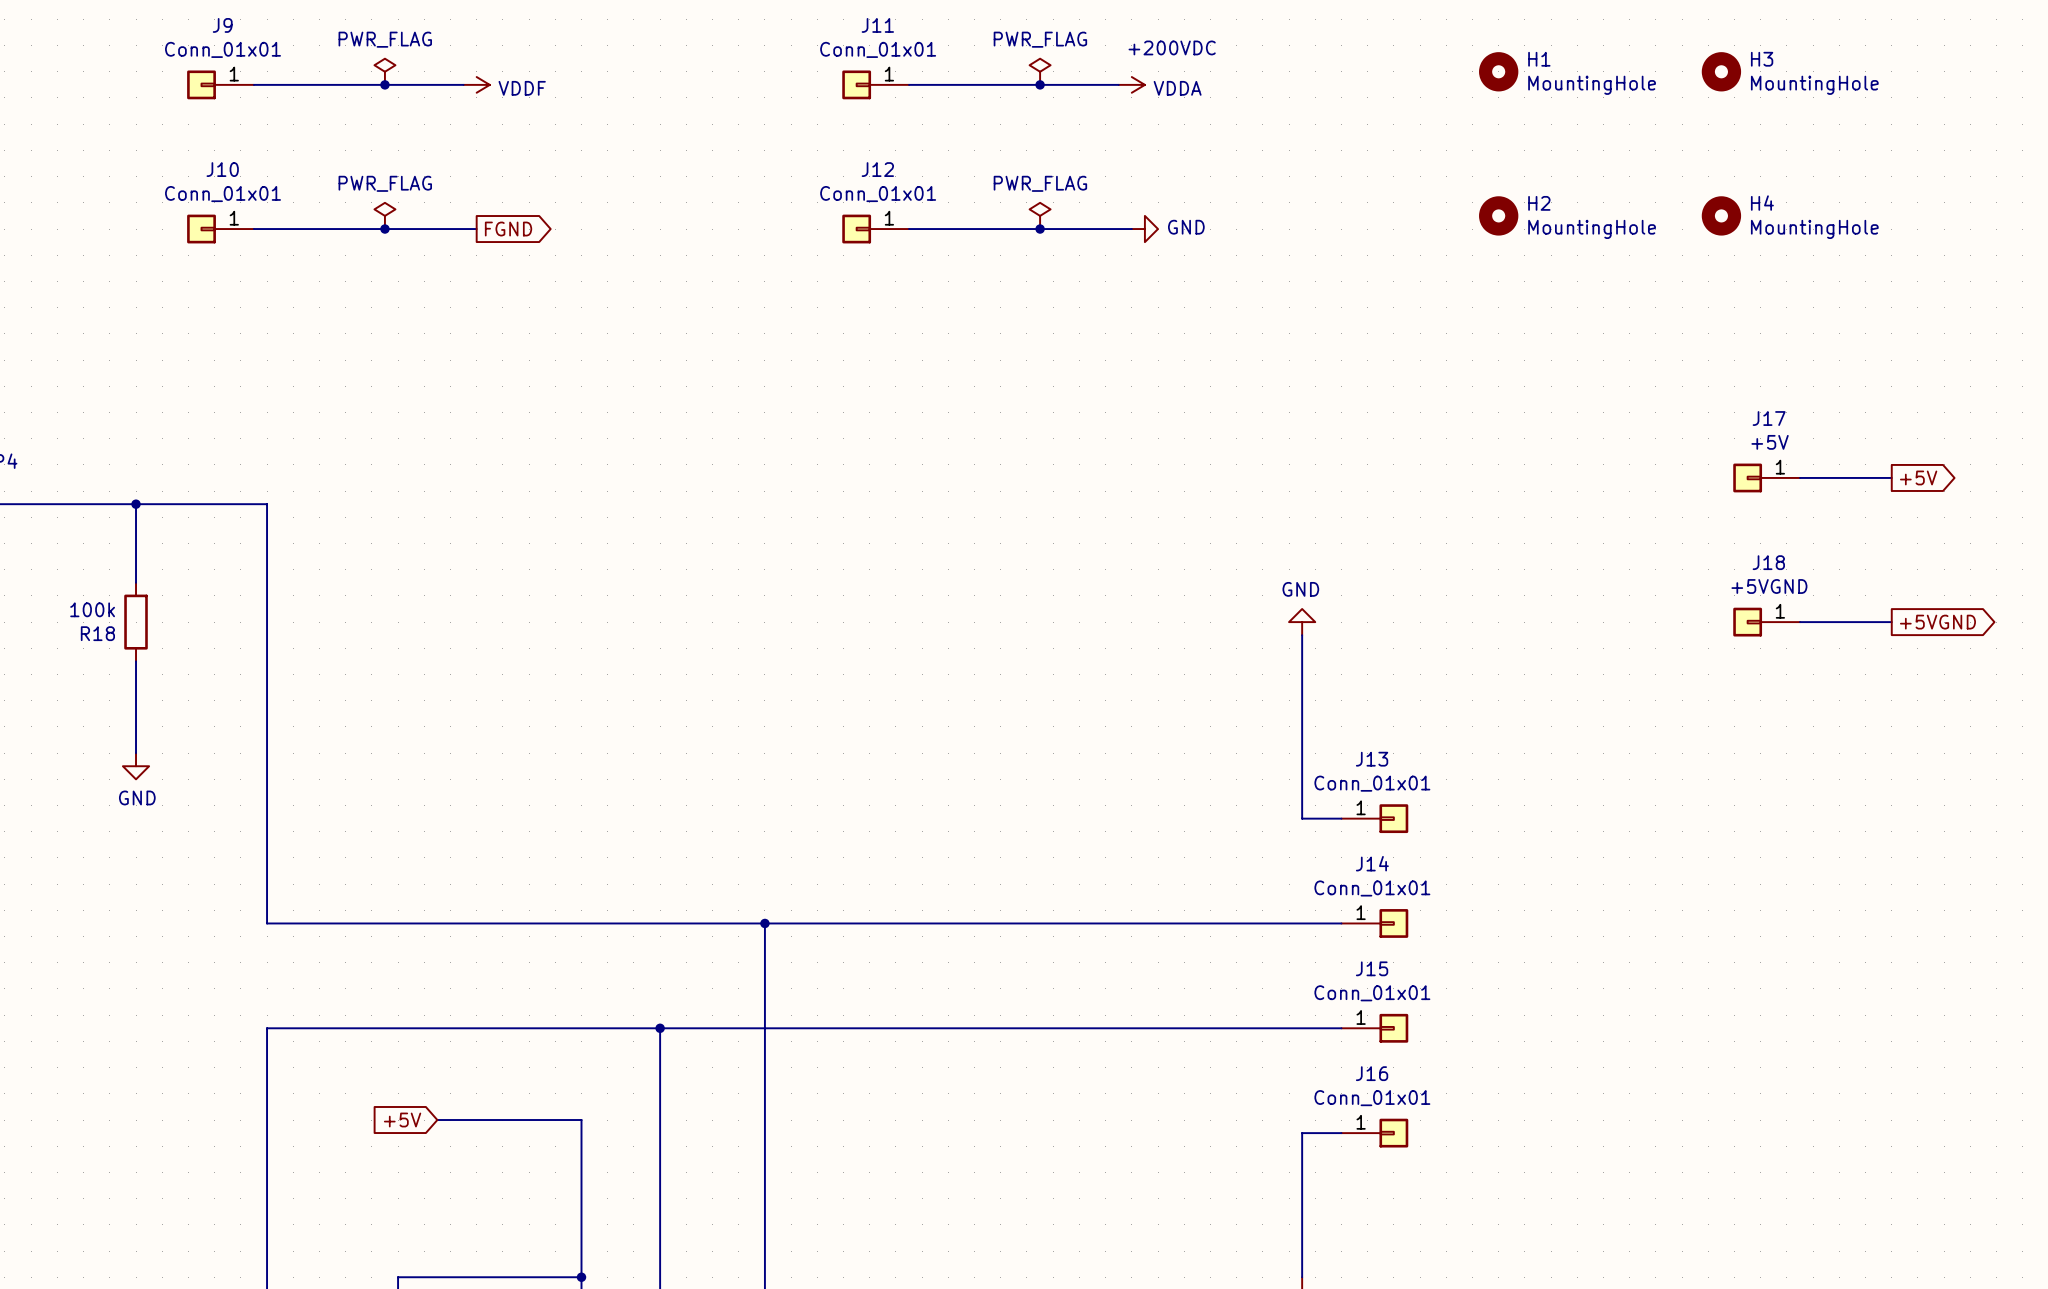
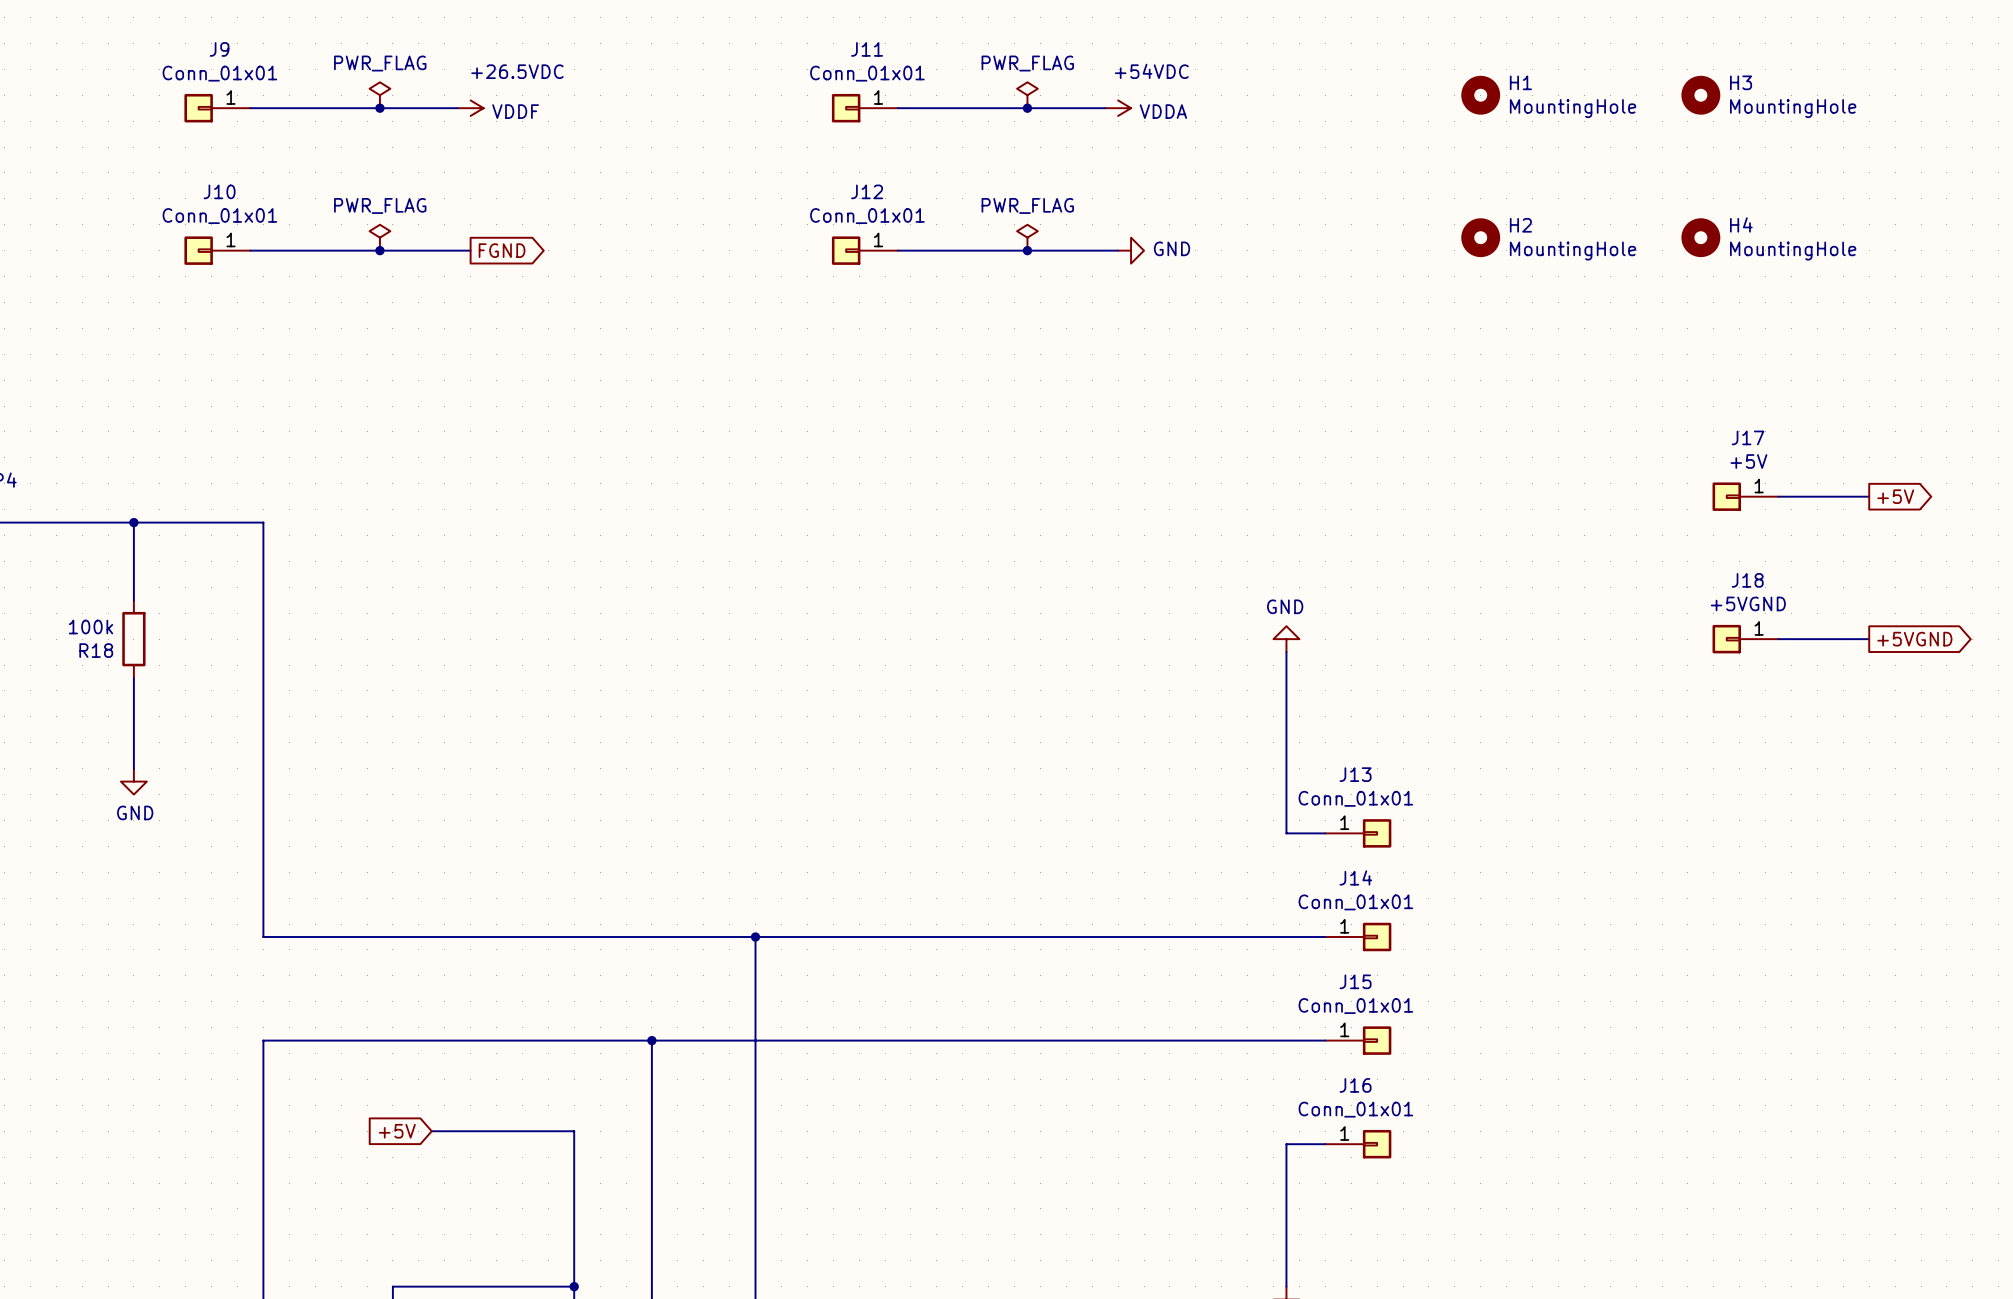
text: none -> +26.5VDC (517, 71)
text: +200VDC (1172, 47) -> +54VDC (1151, 71)

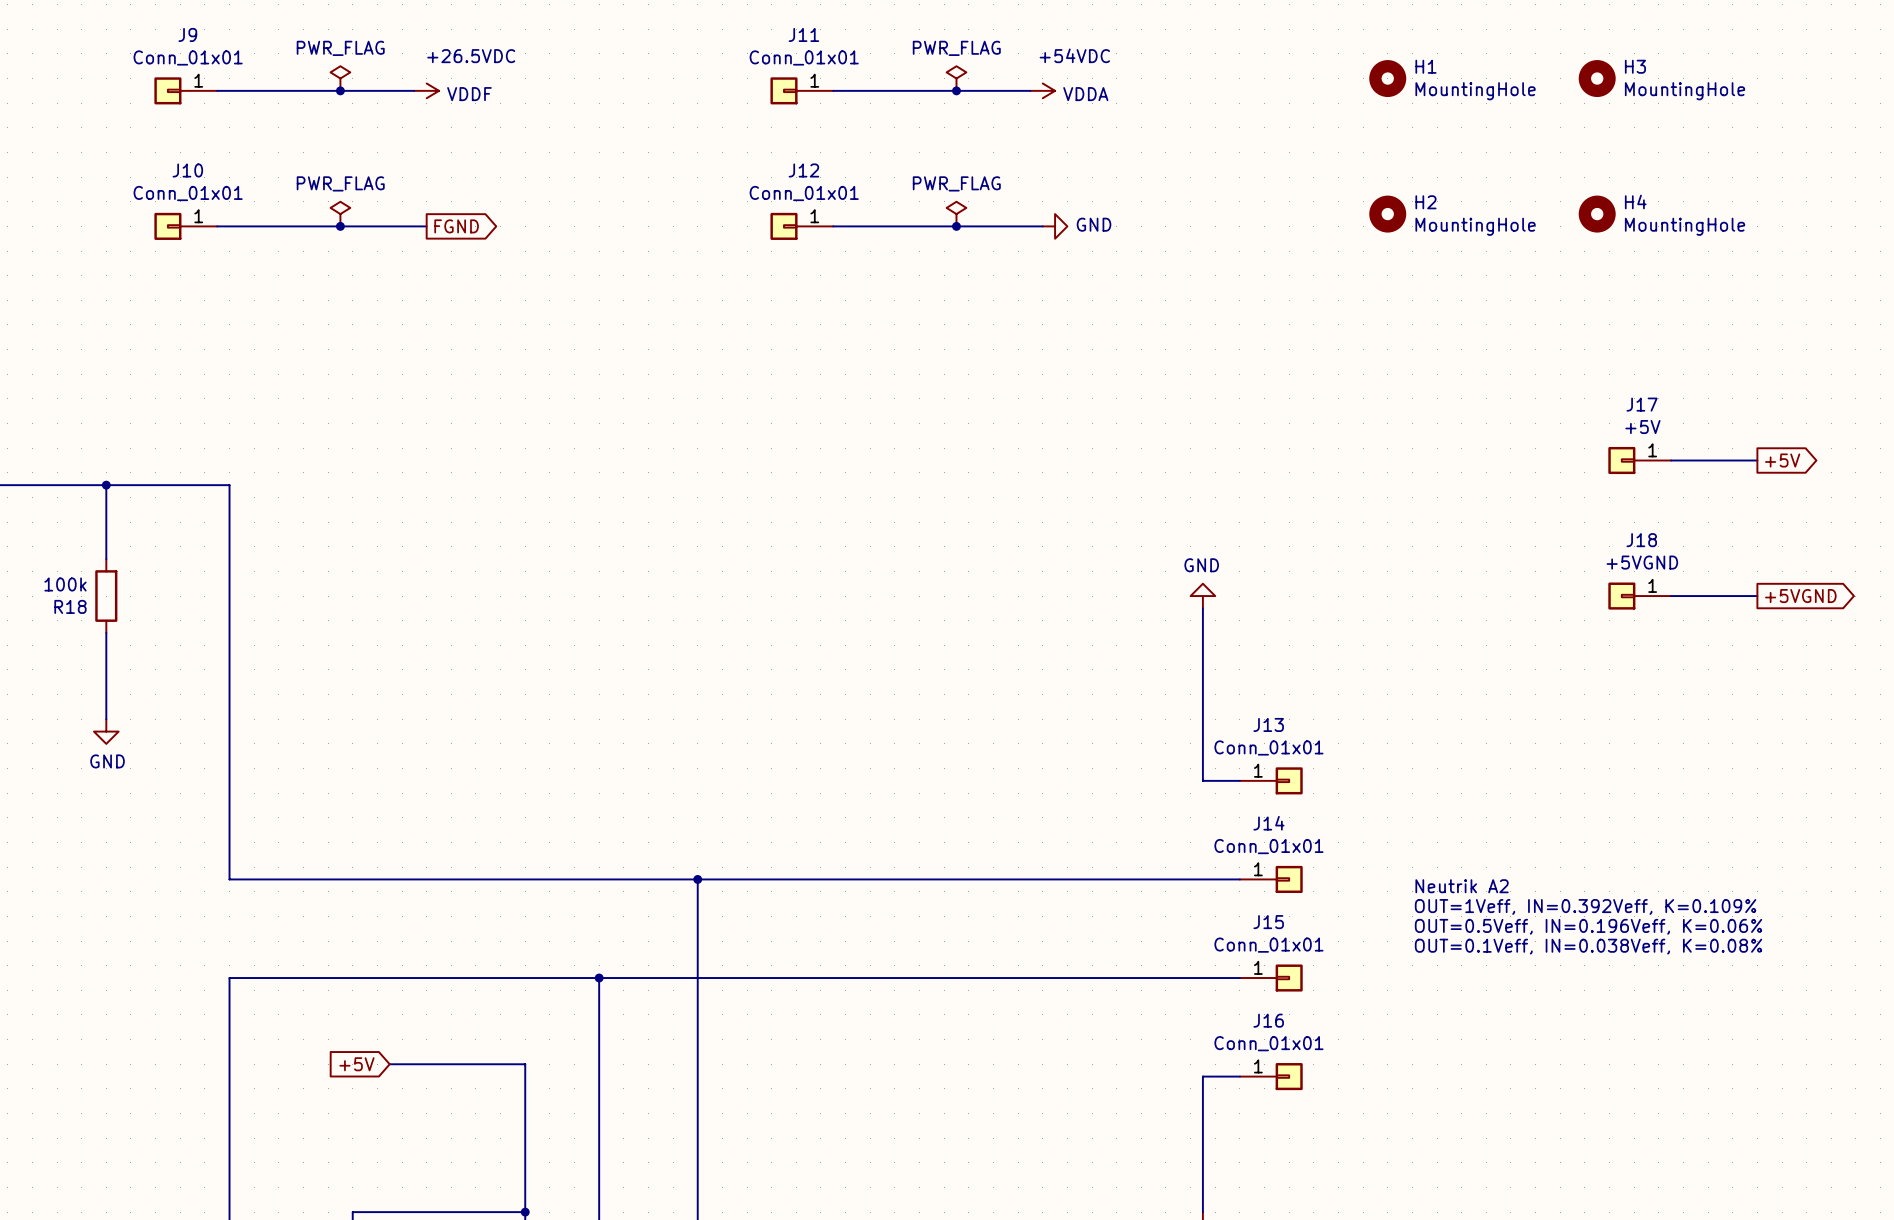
text: none -> Neutrik A2 (1462, 886)
text: none -> OUT=1Veff, IN=0.392Veff, K=0.109% (1585, 906)
text: none -> OUT=0.5Veff, IN=0.196Veff, K=0.06% (1588, 926)
text: none -> OUT=0.1Veff, IN=0.038Veff, K=0.08% (1588, 946)

